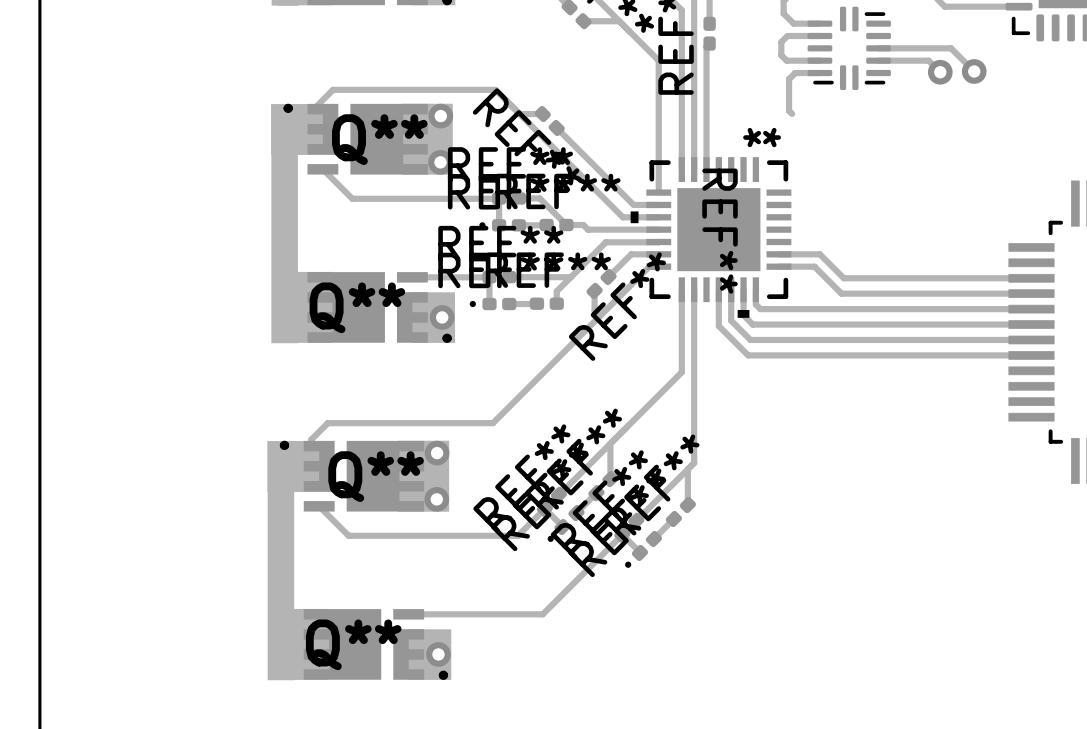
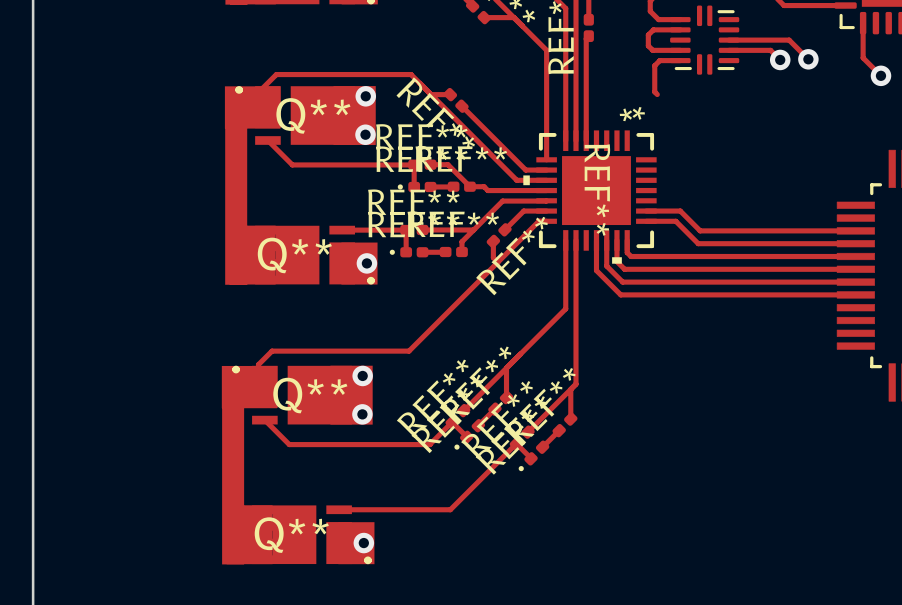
track: none -> (863, 23) (863, 57) (880, 75)
via: none -> (880, 75)

